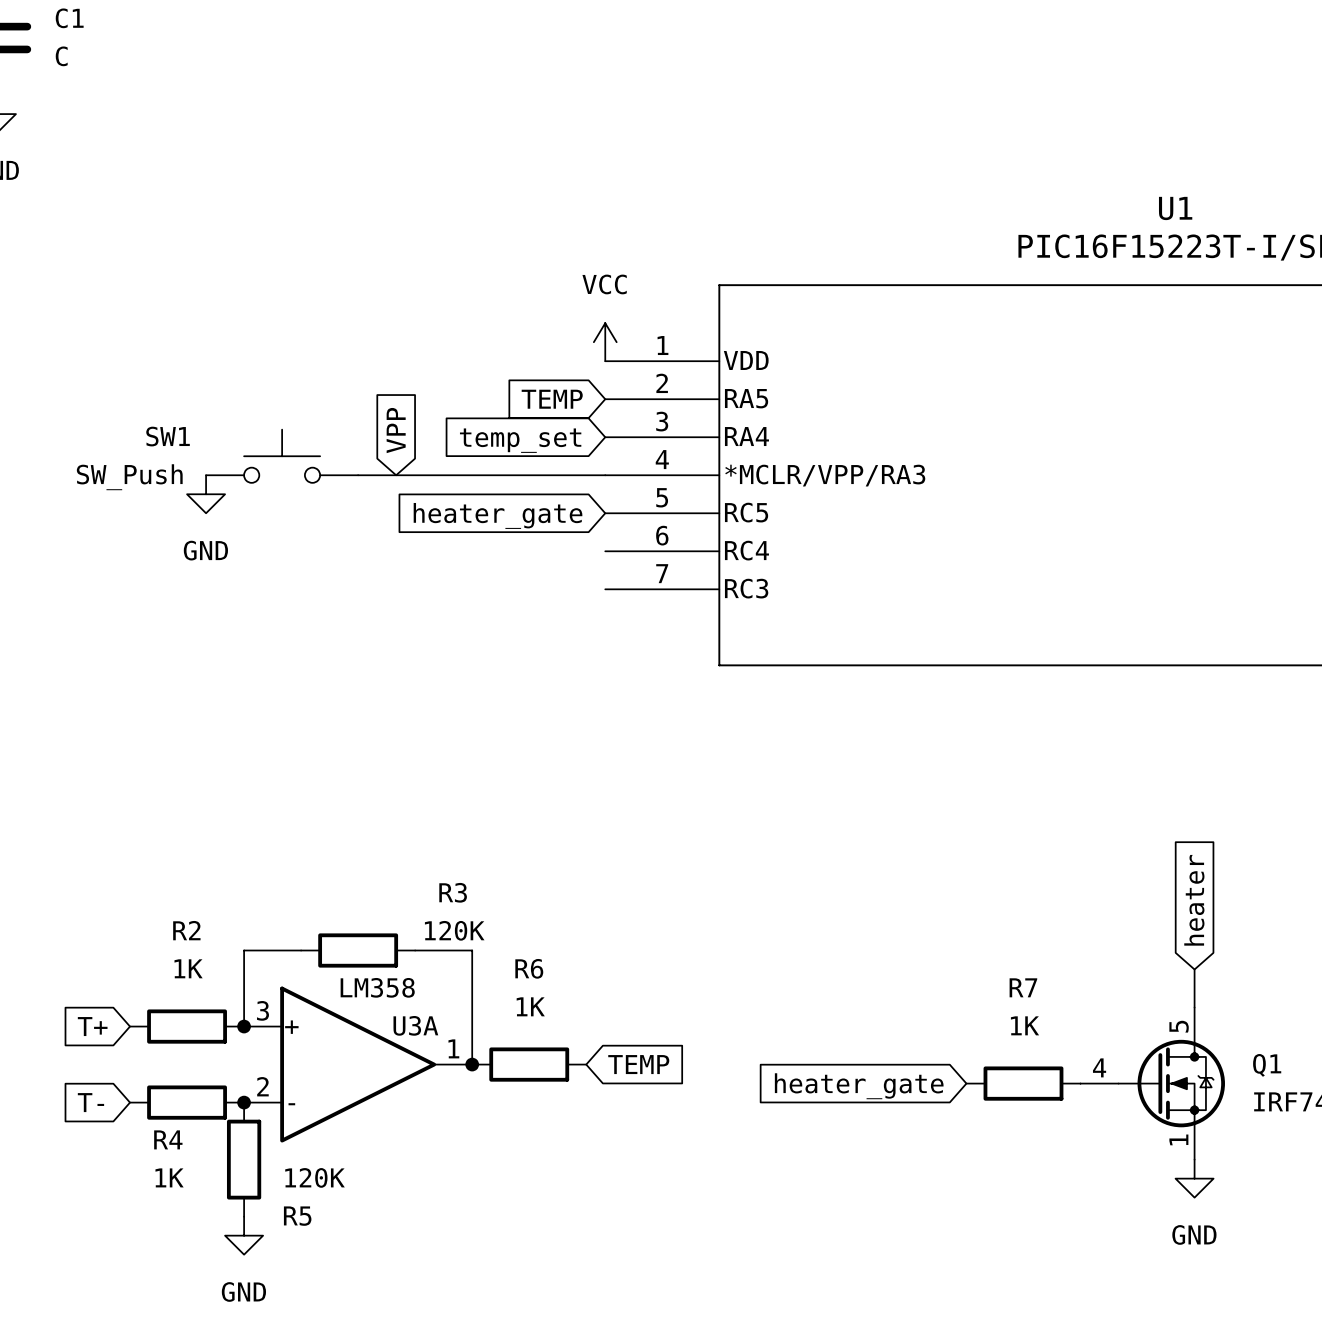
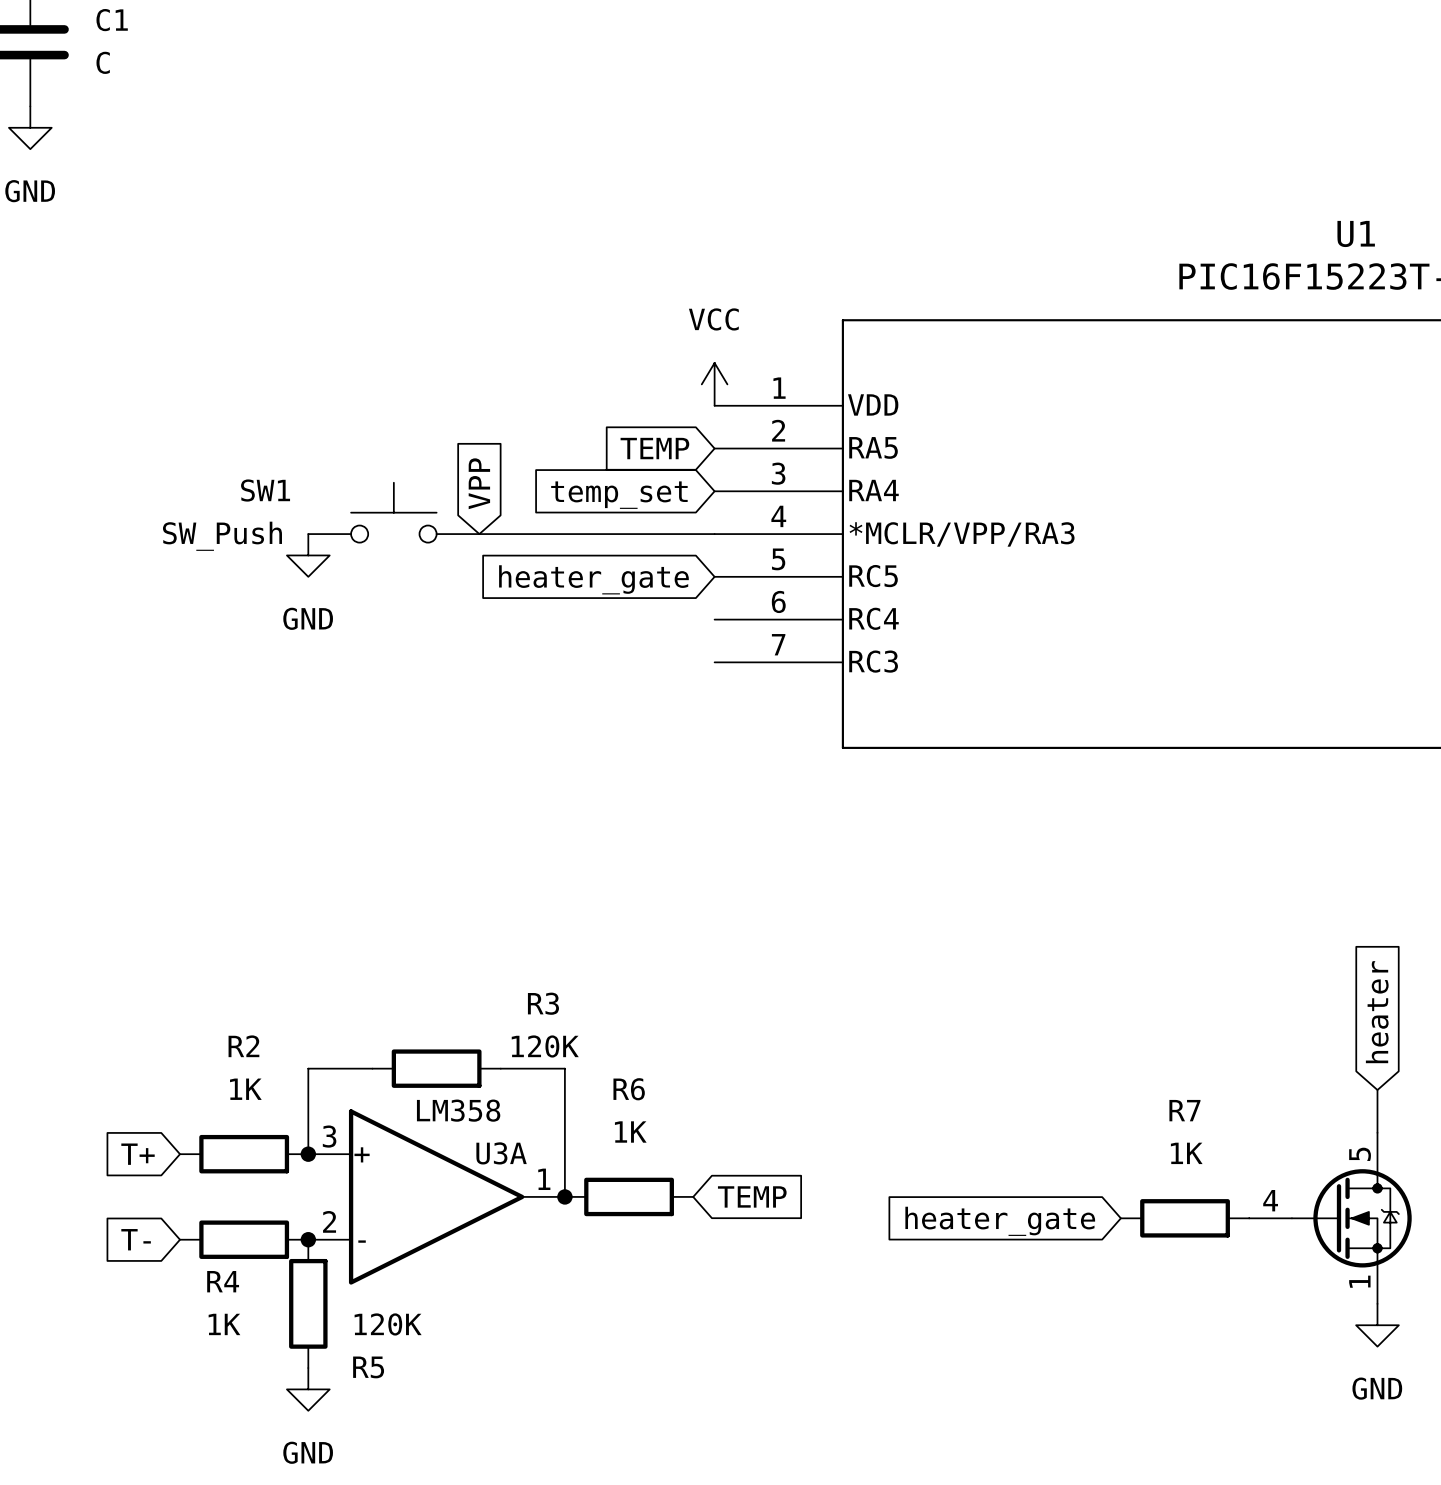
SW1 position: (282, 456) -> (393, 512)
power symbol position: GND (206, 494) -> GND (308, 555)

